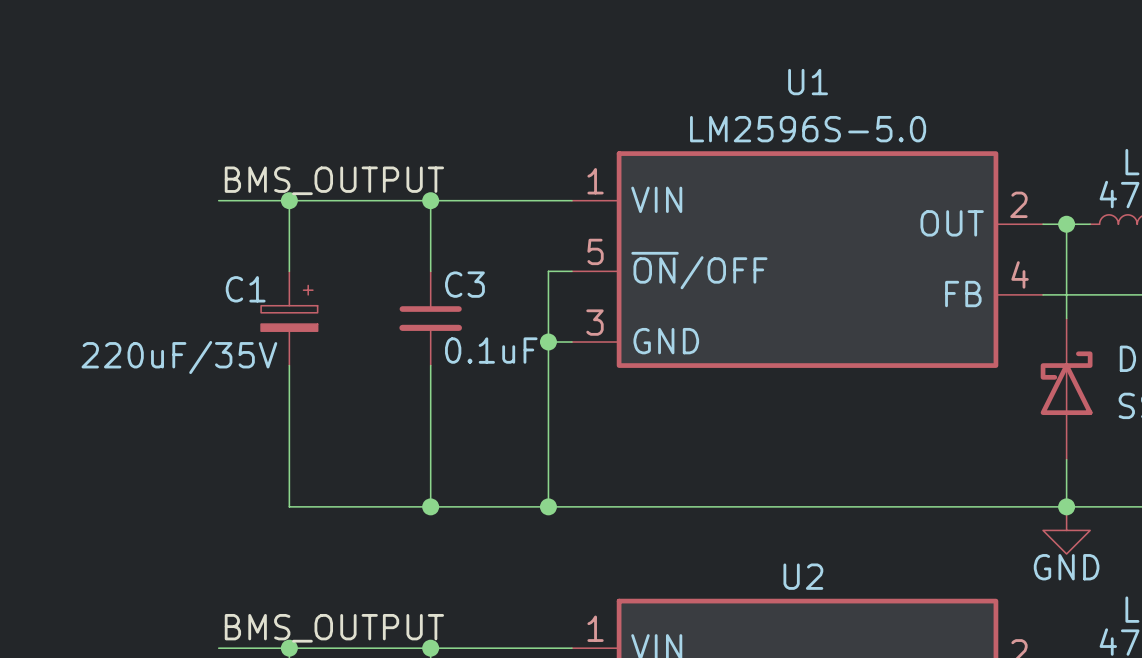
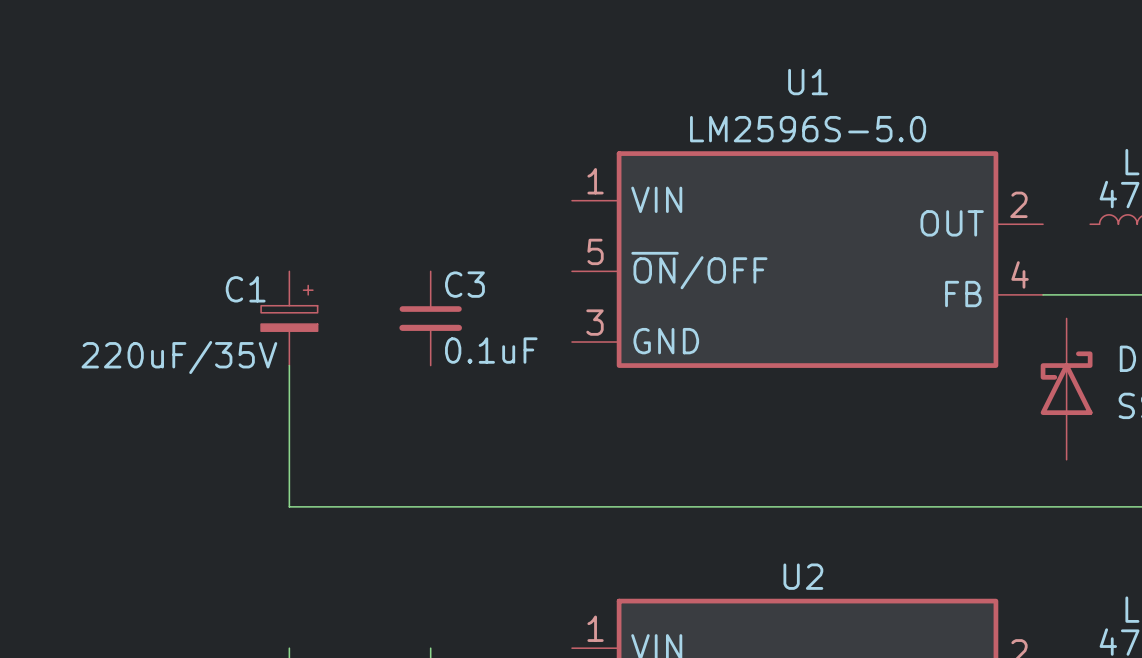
label: BMS_OUTPUT (334, 180) -> none
wire: (218, 200) (572, 200) -> none
wire: (289, 200) (289, 271) -> none
junction: (289, 200) -> none
wire: (430, 200) (430, 271) -> none
junction: (430, 200) -> none
wire: (1043, 224) (1090, 224) -> none
wire: (1066, 224) (1066, 318) -> none
junction: (1066, 224) -> none
wire: (572, 271) (548, 271) (548, 506) -> none
wire: (548, 342) (572, 342) -> none
junction: (548, 342) -> none
wire: (430, 365) (430, 506) -> none
wire: (1066, 459) (1066, 506) -> none
junction: (430, 506) -> none
junction: (548, 506) -> none
junction: (1066, 506) -> none
power symbol: GND (1066, 530) -> none
label: BMS_OUTPUT (334, 628) -> none
wire: (218, 648) (572, 648) -> none
junction: (289, 648) -> none
junction: (430, 648) -> none

